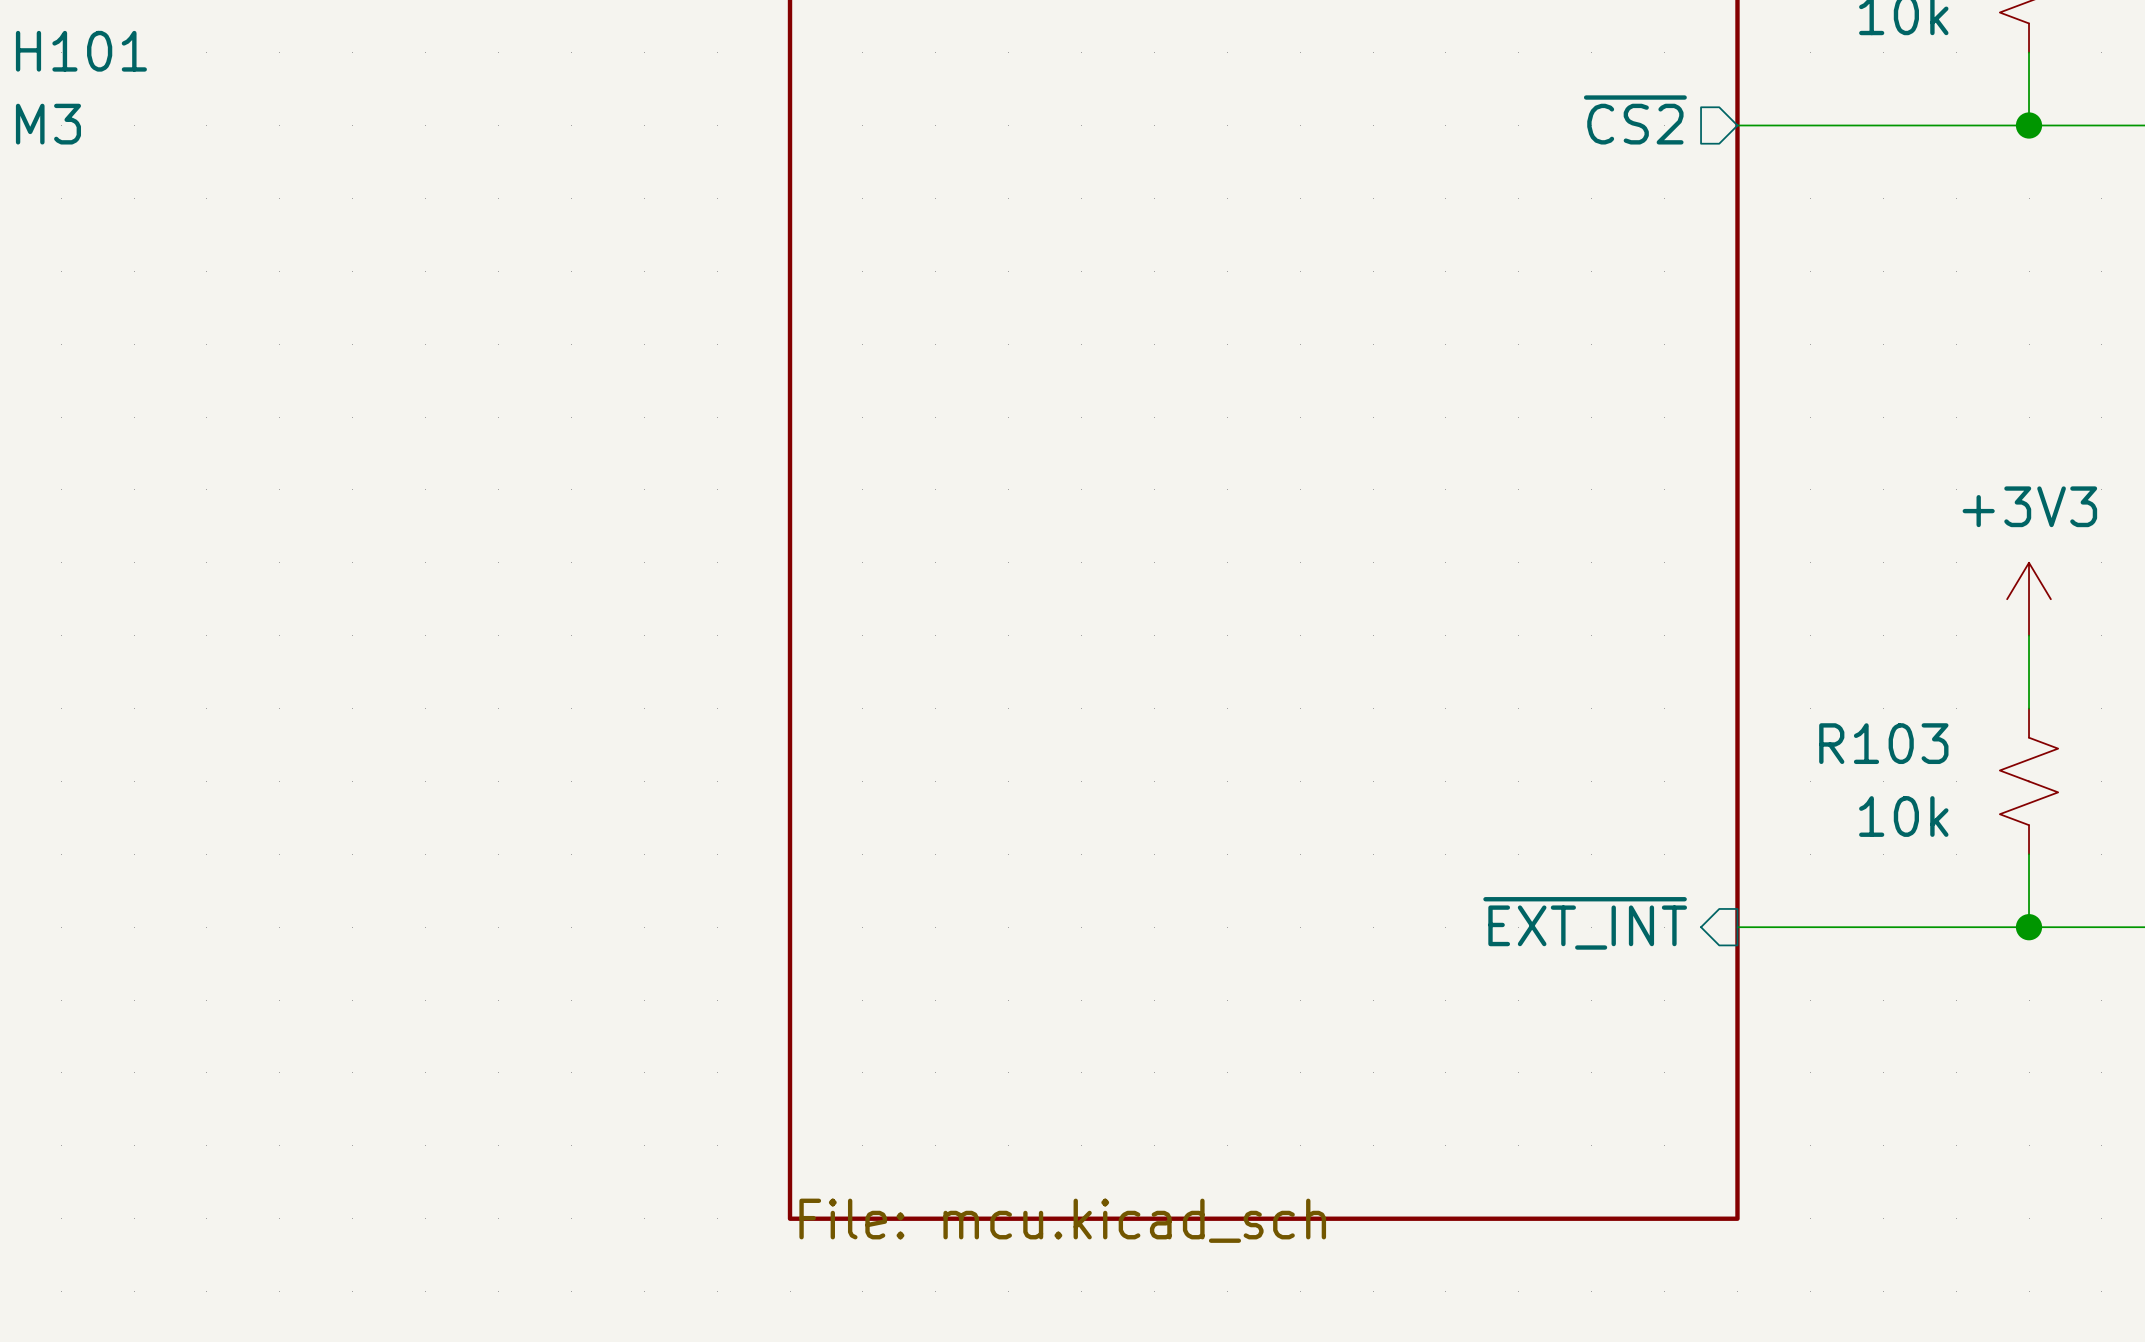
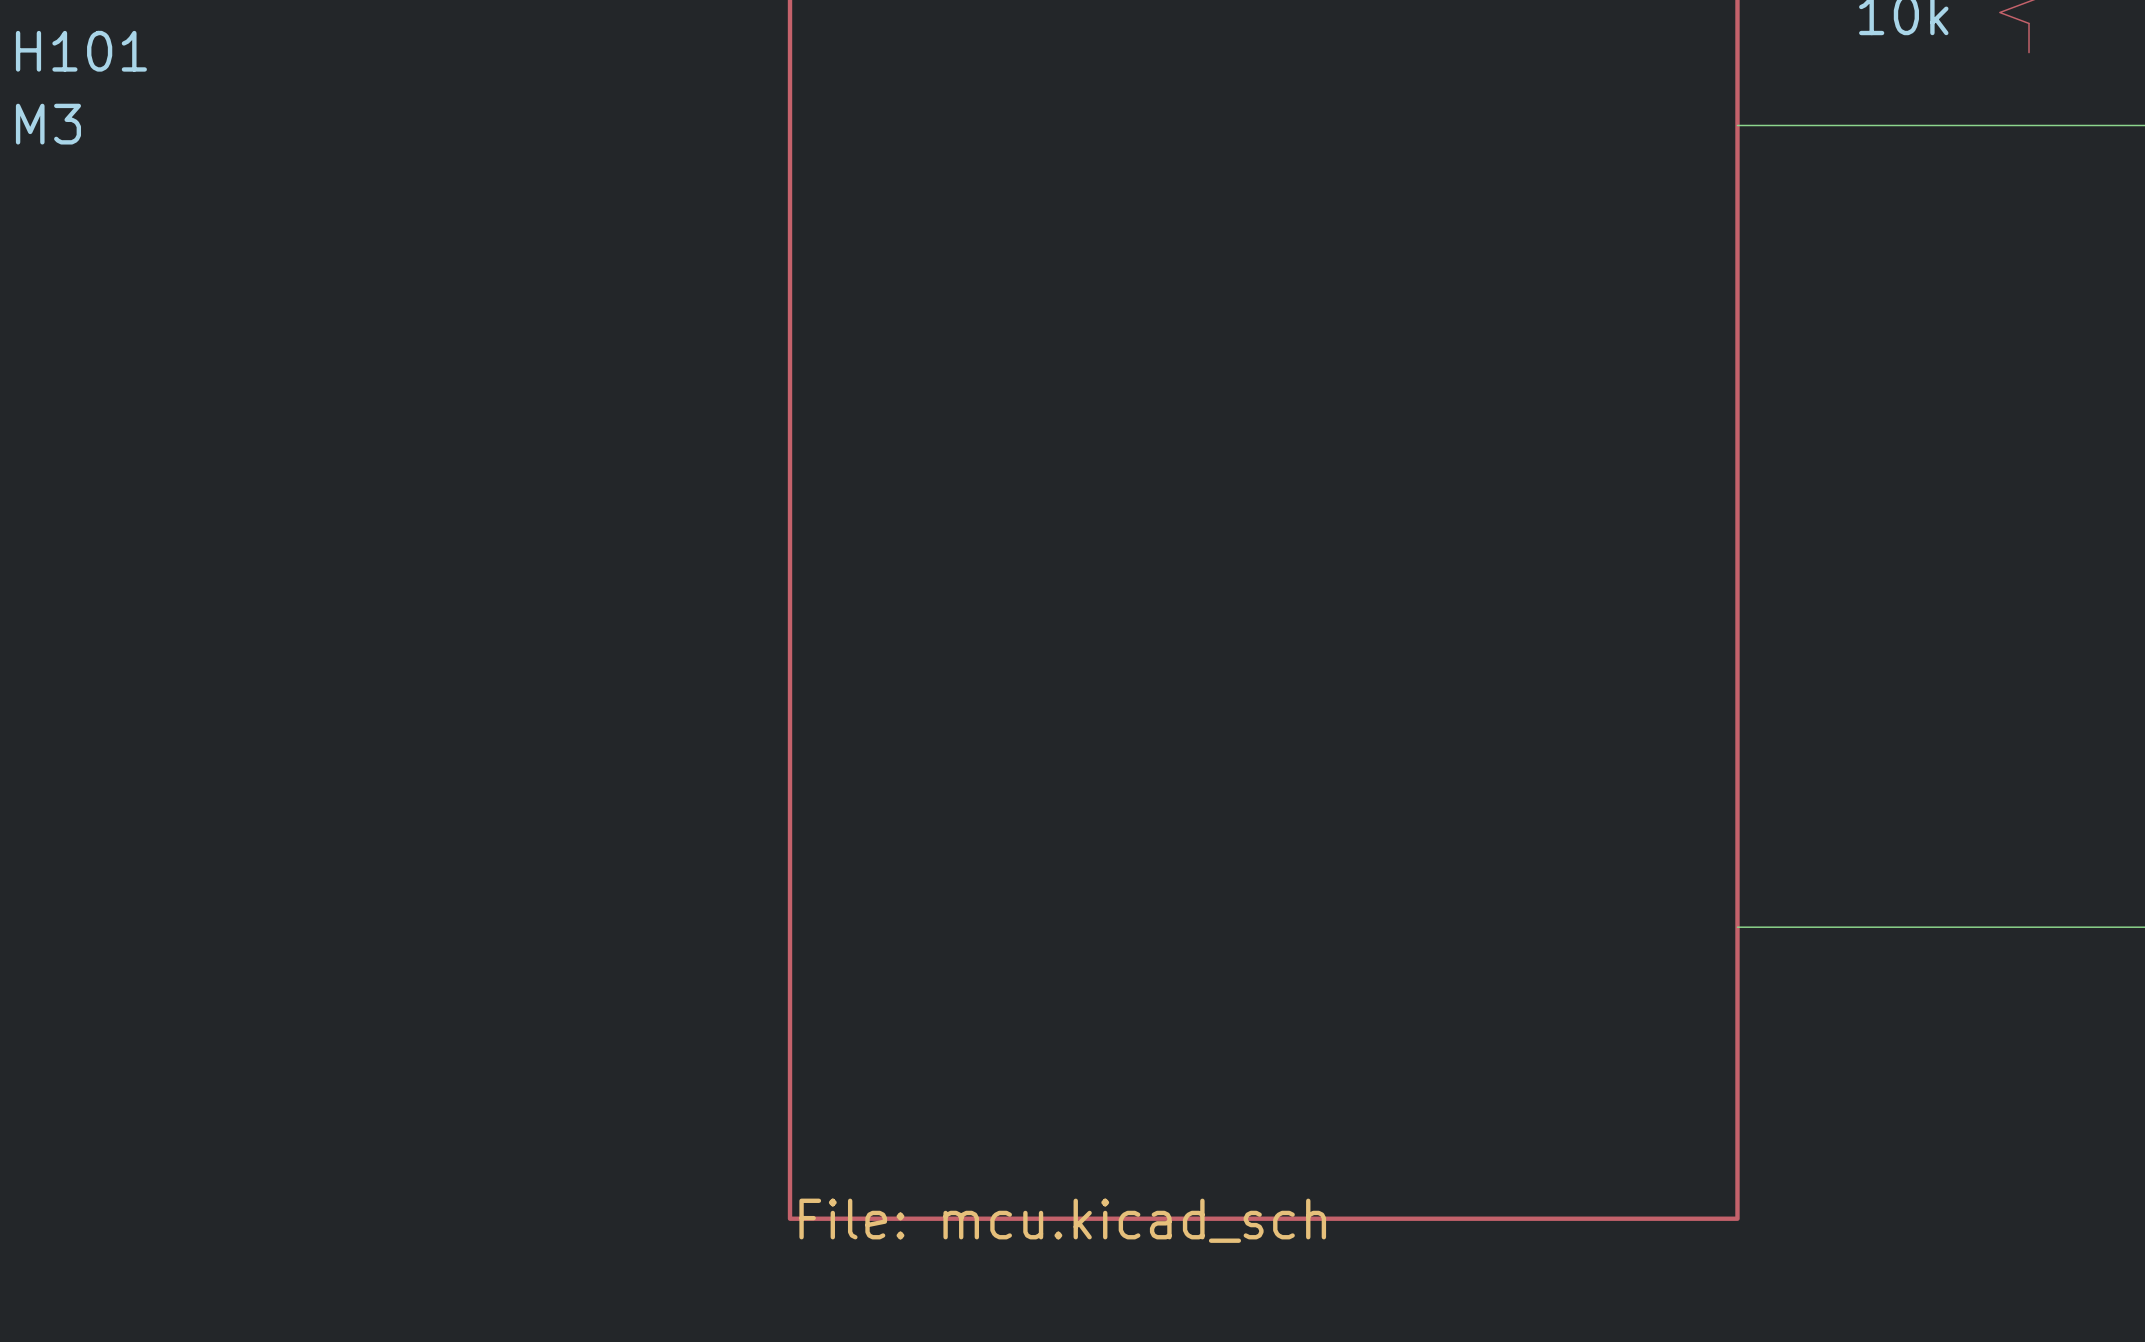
wire: (2029, 52) (2029, 125) -> none
sheet pin: ~{CS2} (1635, 119) -> none
junction: (2029, 125) -> none
power symbol: +3V3 (2029, 599) -> none
wire: (2029, 635) (2029, 708) -> none
R103: 10k (2029, 781) -> none
wire: (2029, 854) (2029, 927) -> none
sheet pin: ~{EXT_INT} (1585, 923) -> none
junction: (2029, 927) -> none

